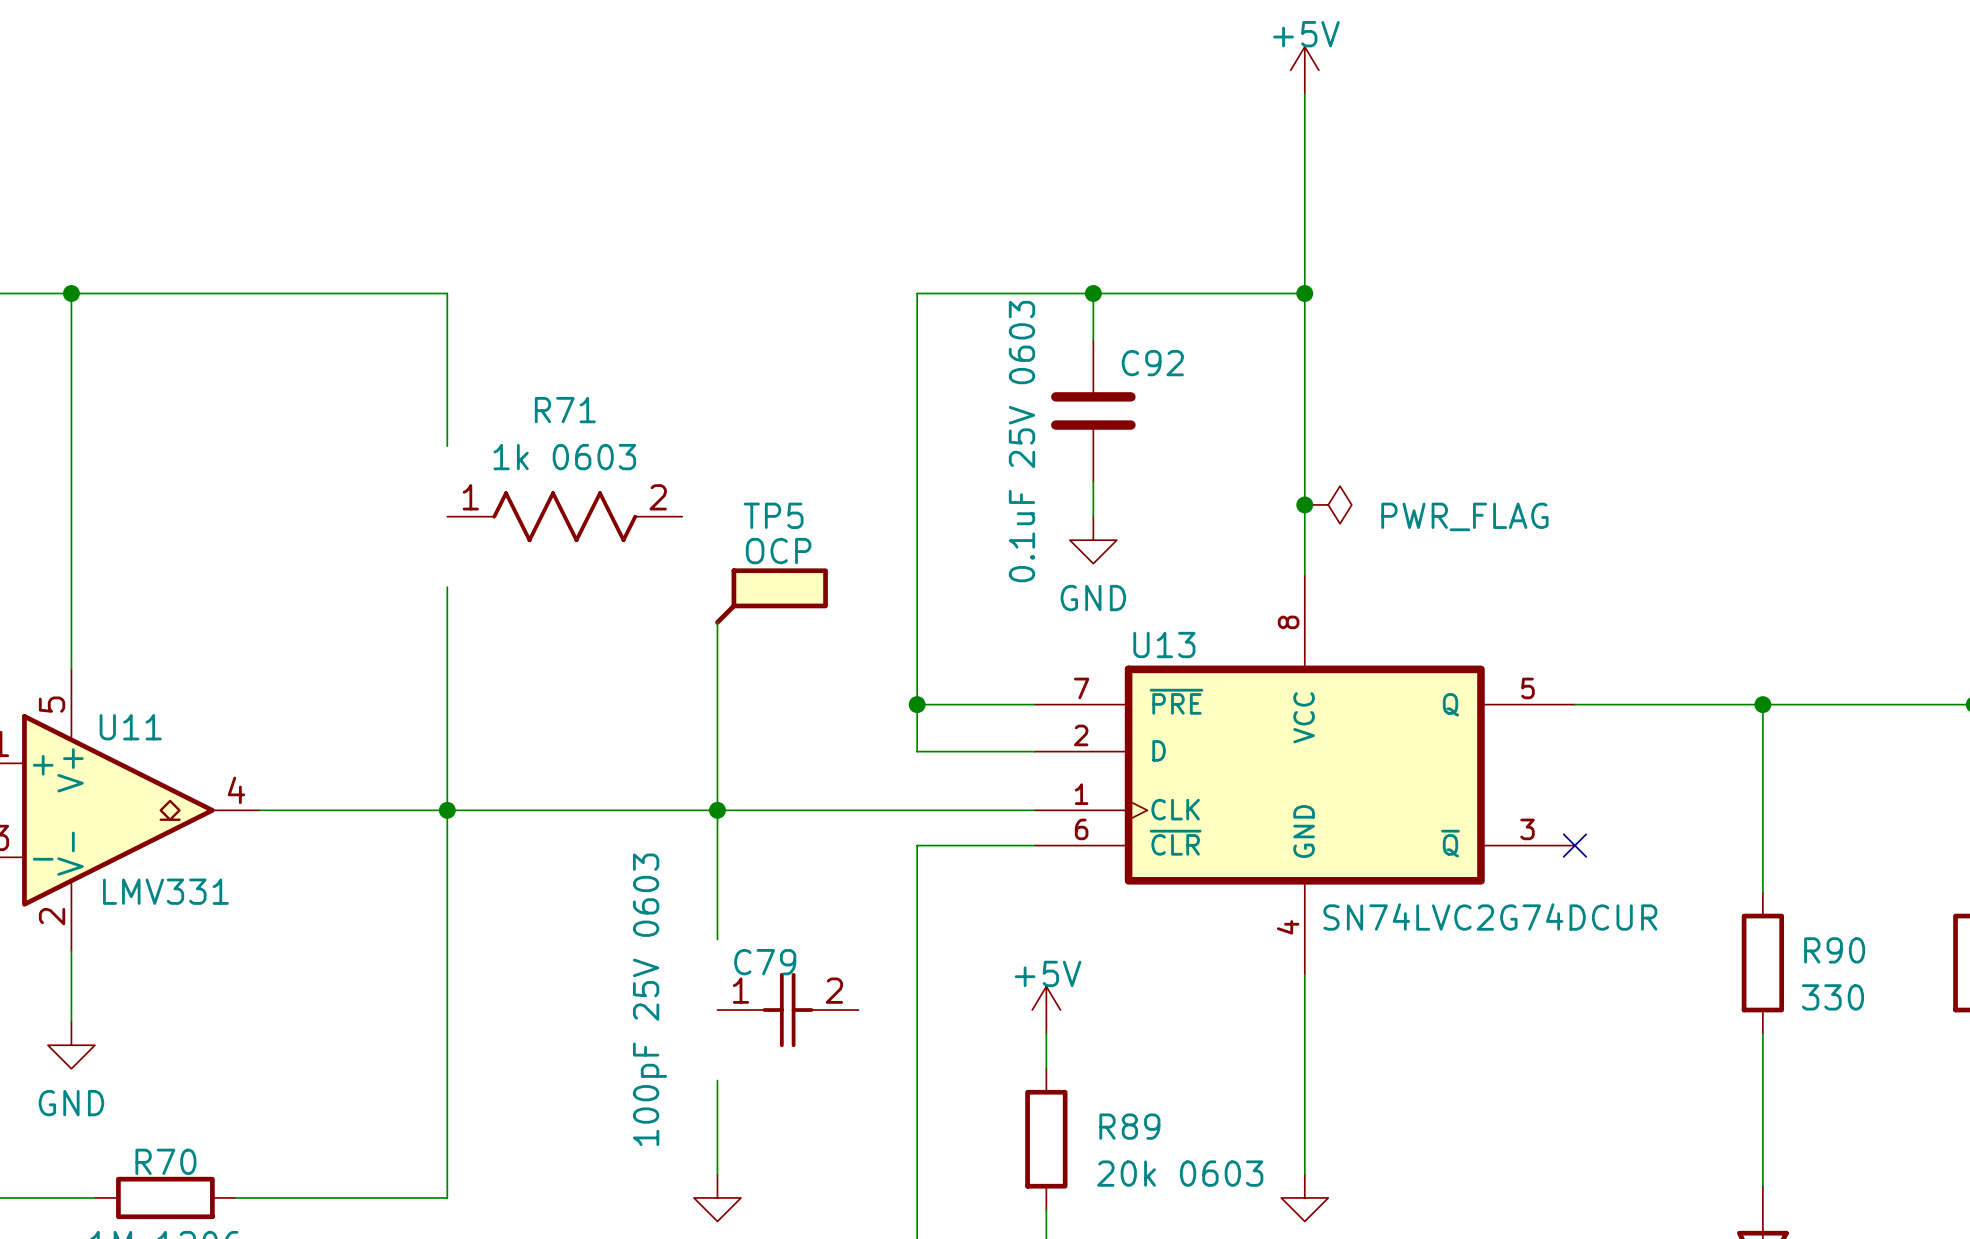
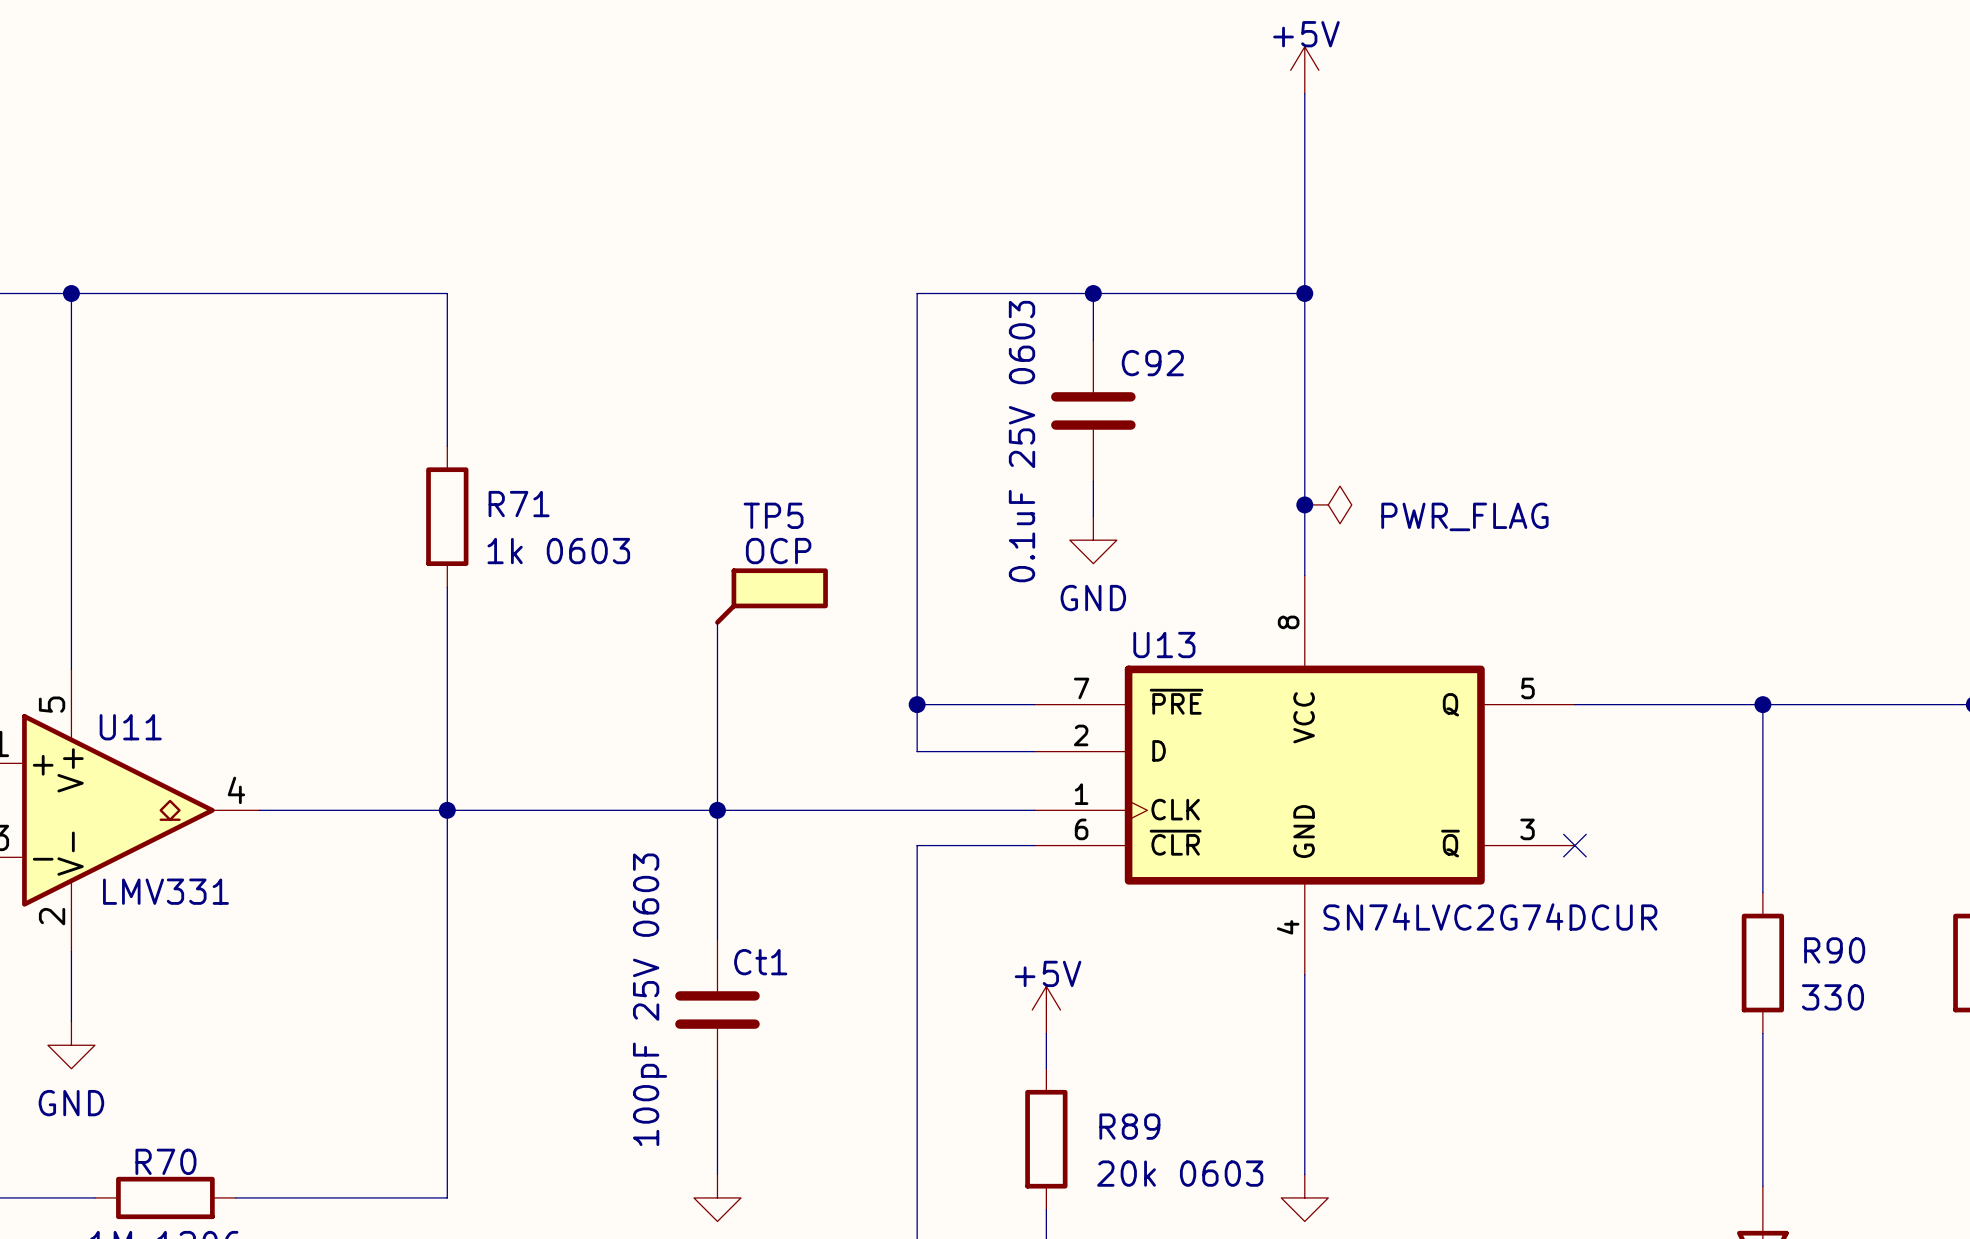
R71 name position: R71 (565, 410) -> R71 (519, 504)
R71 value position: 1k 0603 (564, 457) -> 1k 0603 (558, 551)
R71 symbol: [447, 491, 683, 543] -> [426, 446, 469, 588]
Ct1: none -> 100pF 25V 0603 (717, 1010)
C79: 100pF 25V 0603 (787, 1010) -> none

